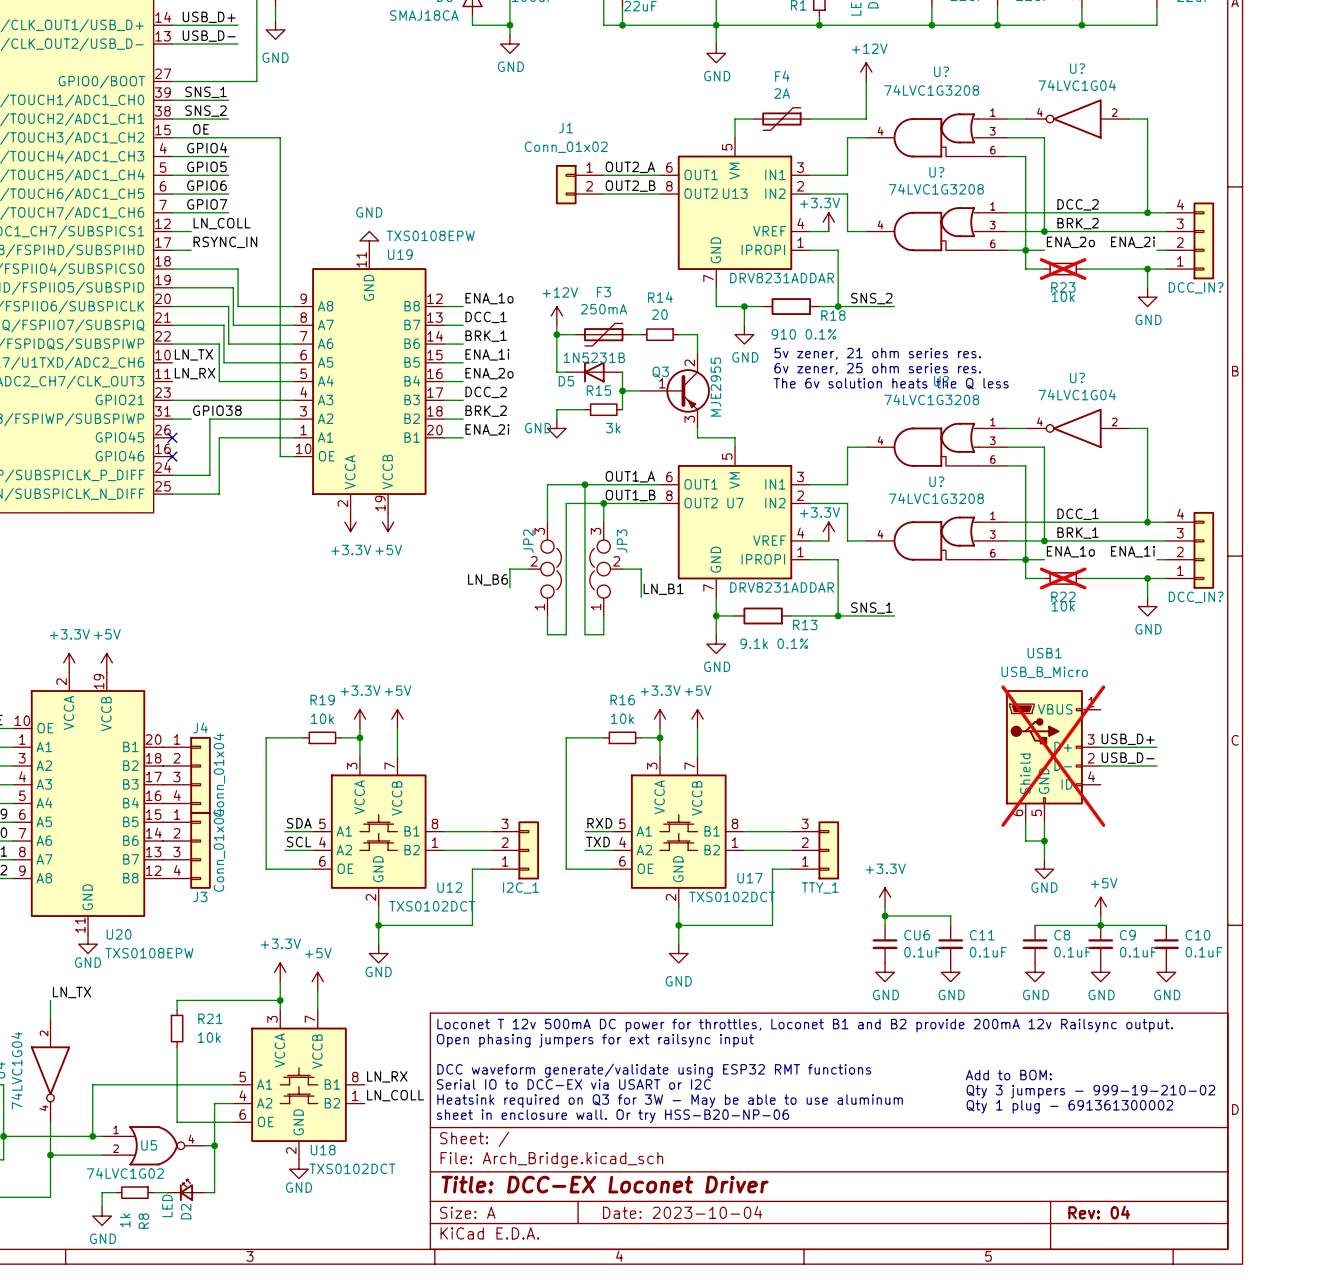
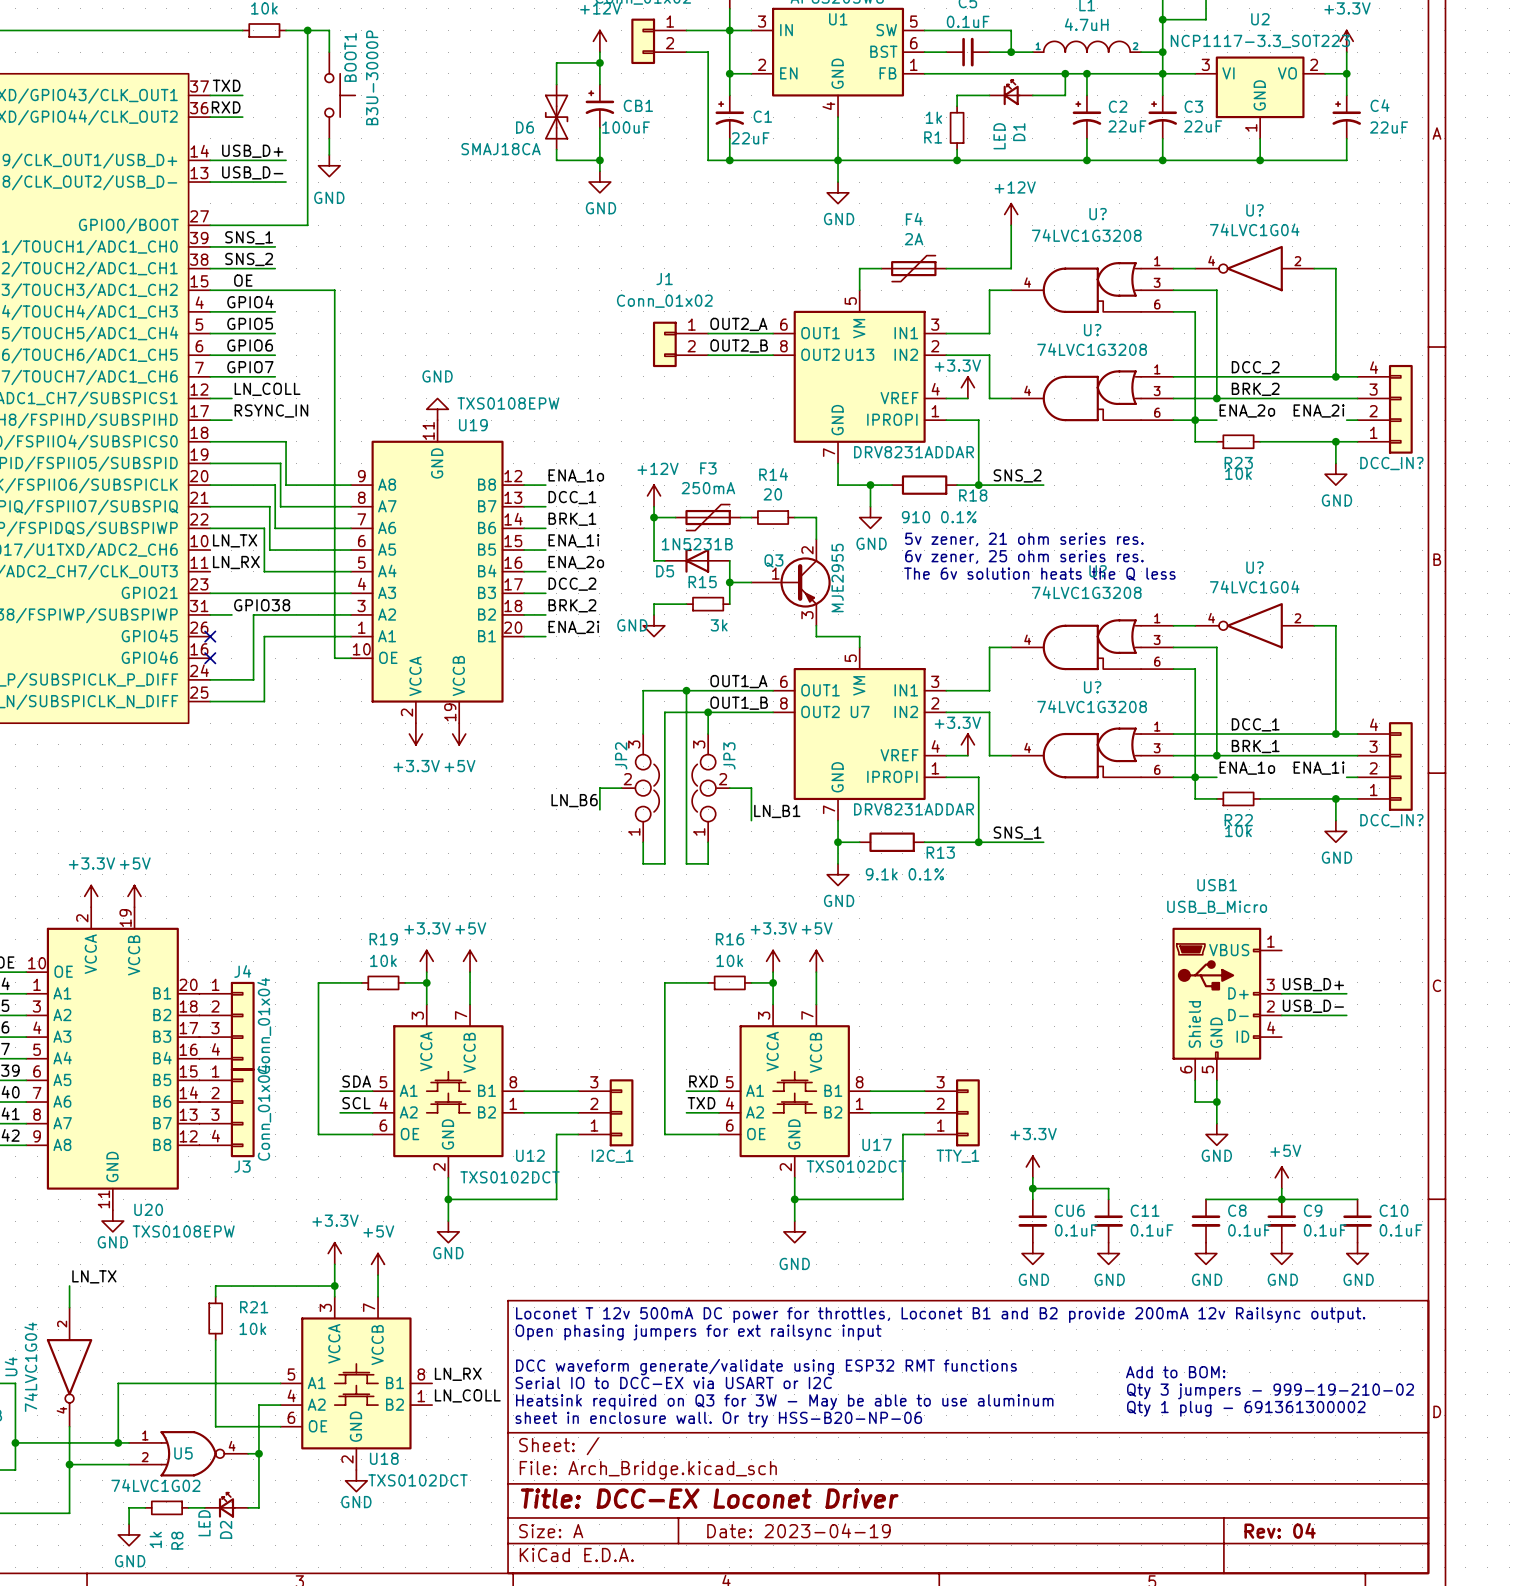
R23 do-not-place cross: (1063, 269) -> none
R22 do-not-place cross: (1063, 578) -> none
USB1 do-not-place cross: (1053, 756) -> none
title block: Date: 2023-10-04 (682, 1212) -> Date: 2023-04-19 (798, 1530)

